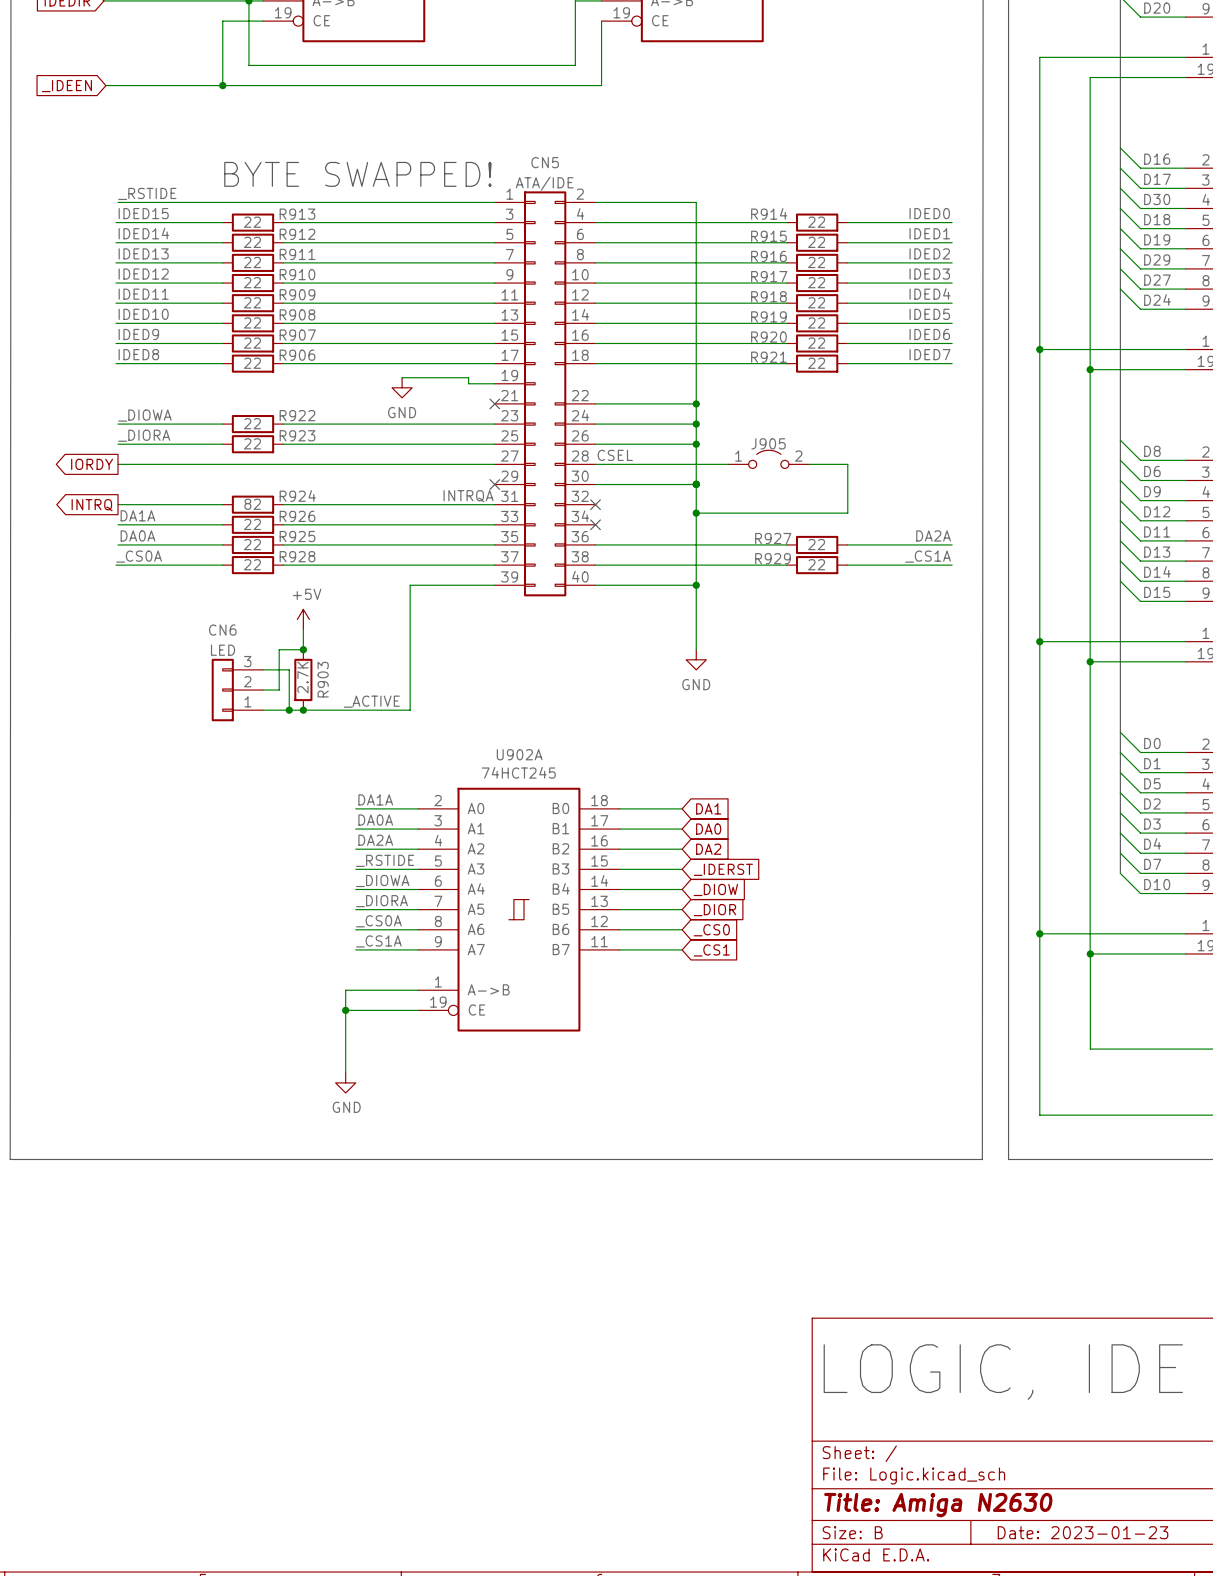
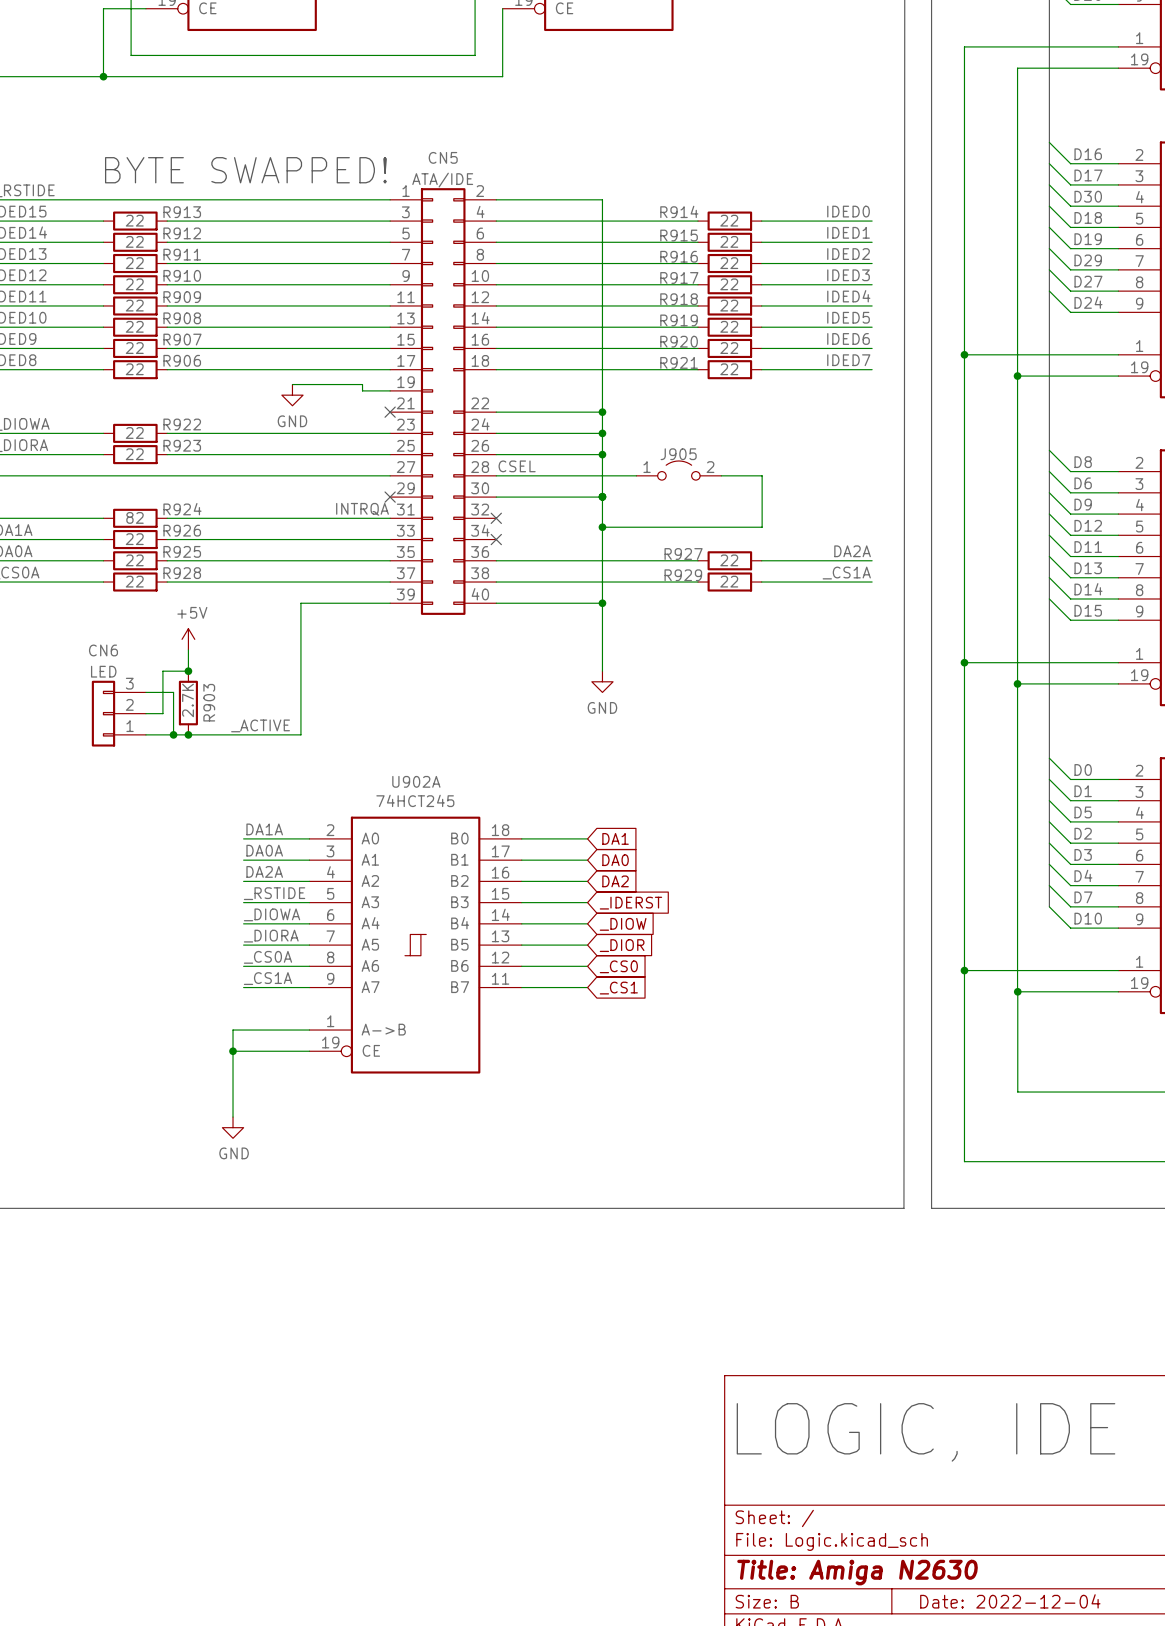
title block: Date: 2023-01-23 (1083, 1532) -> Date: 2022-12-04 (1010, 1601)

